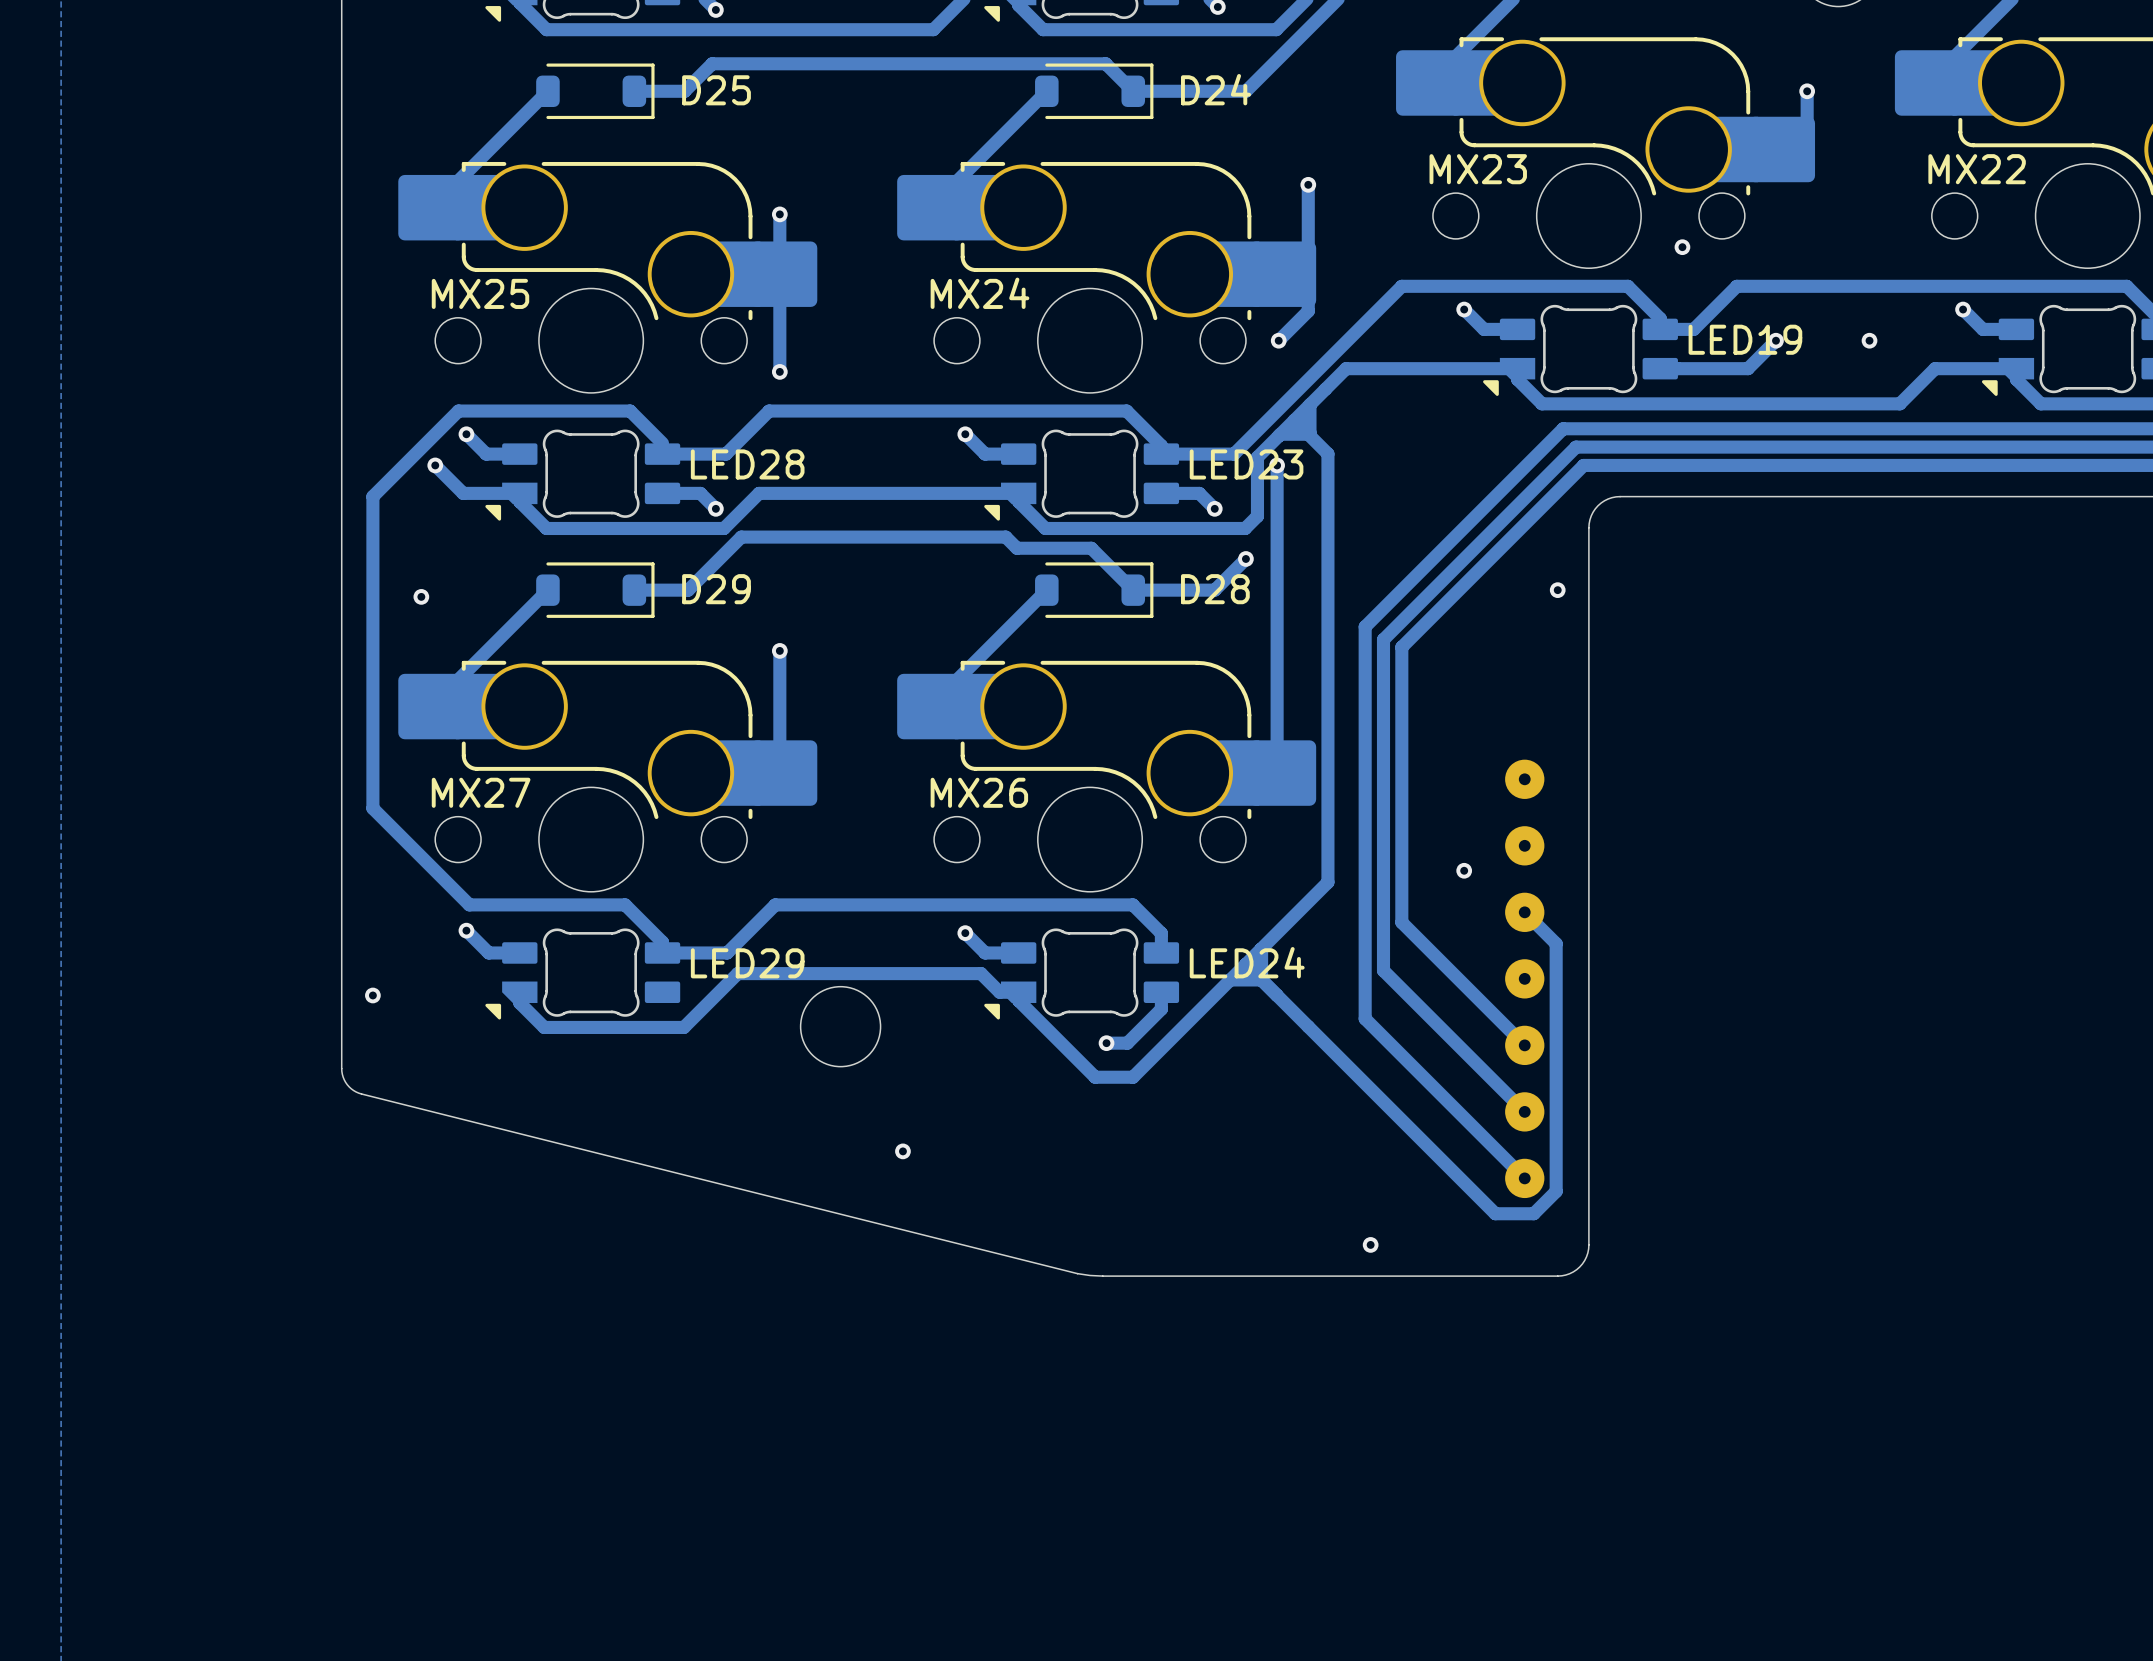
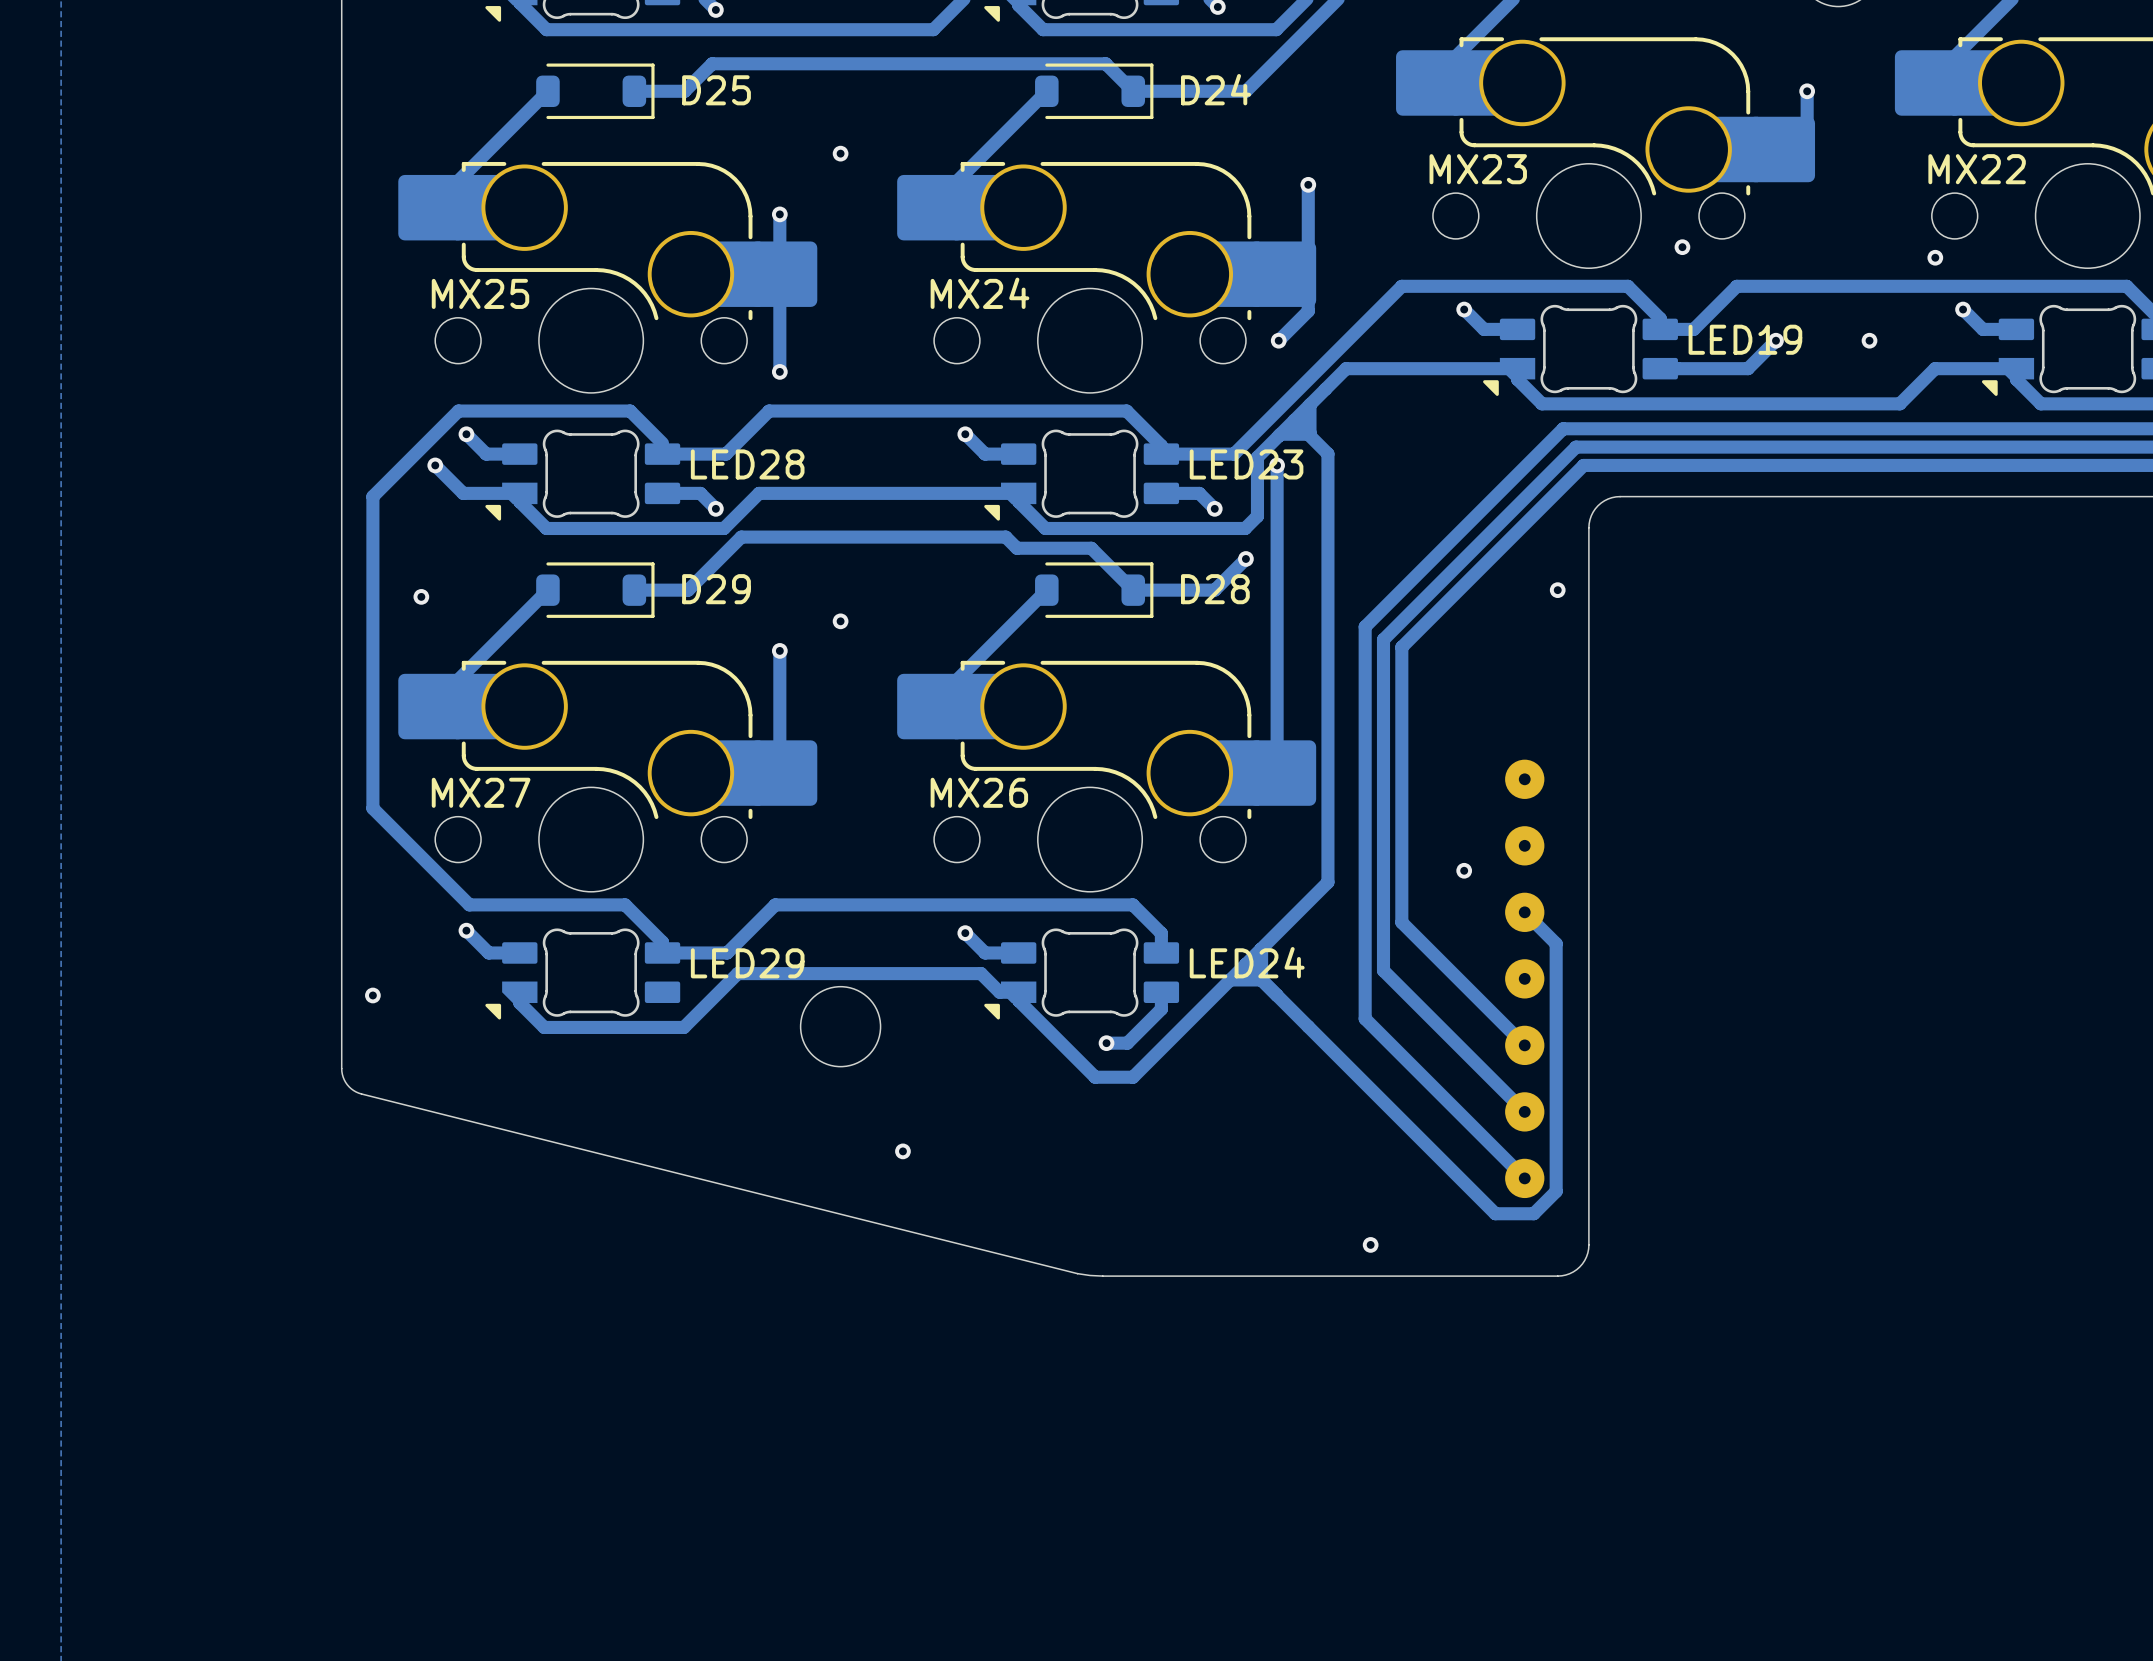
via: none -> (840, 153)
via: none -> (1935, 257)
via: none -> (840, 621)

